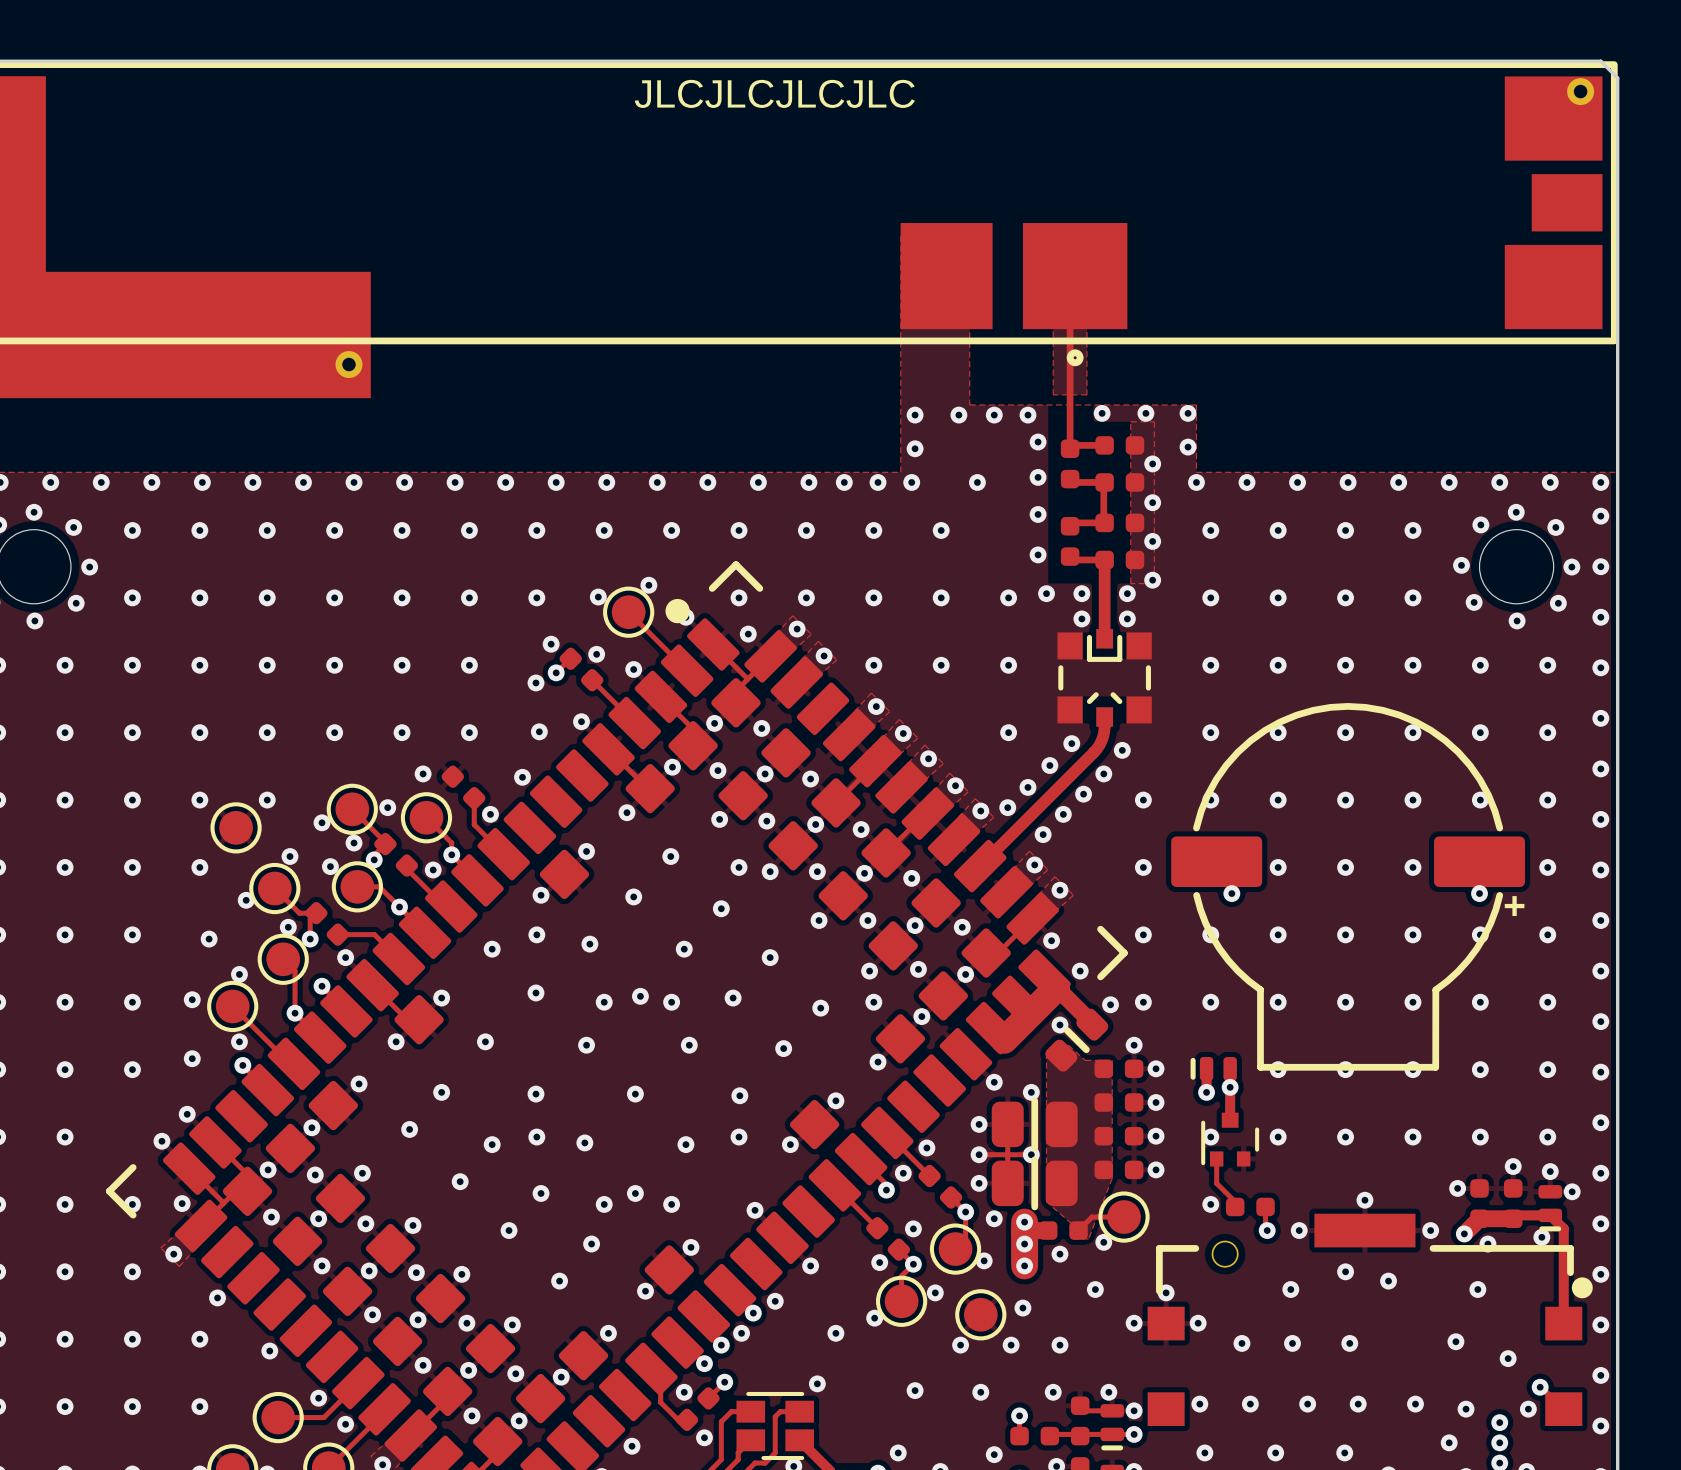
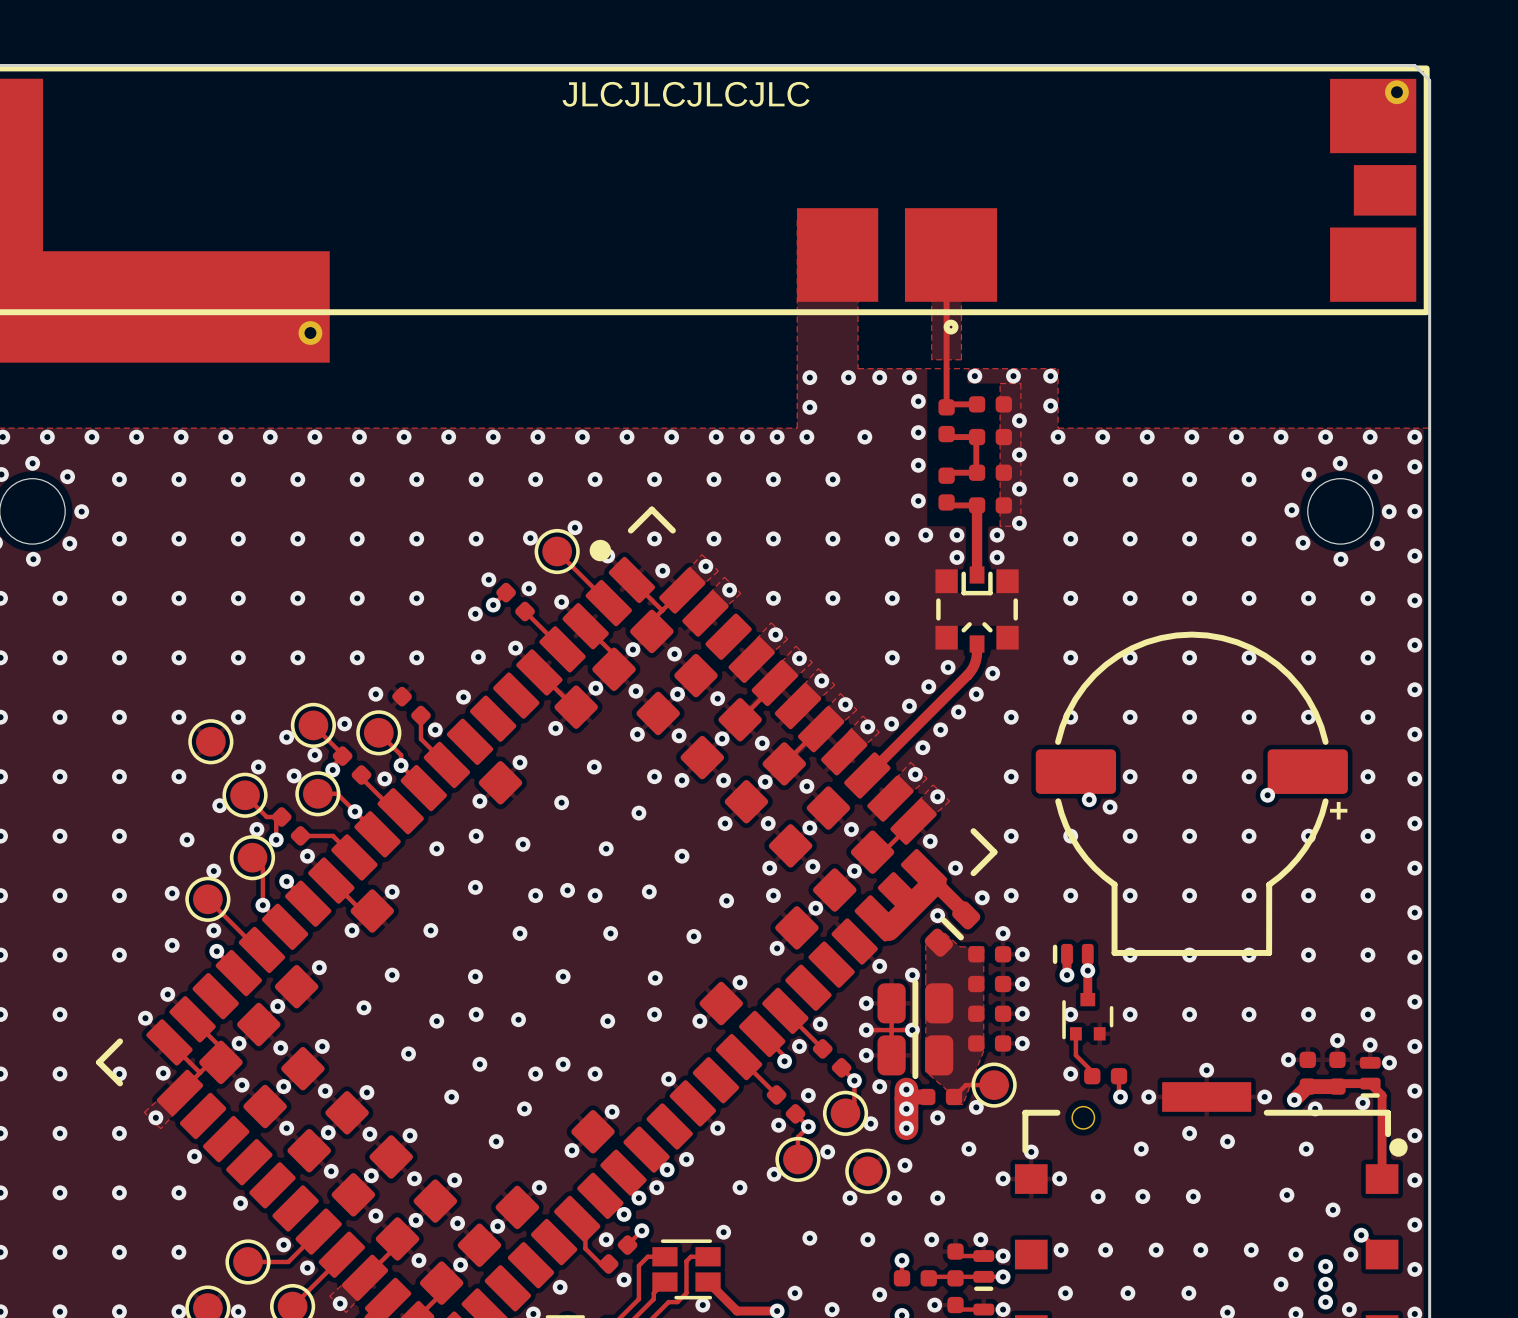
via position: (1479, 893) -> (1267, 795)
via: none -> (1110, 807)

